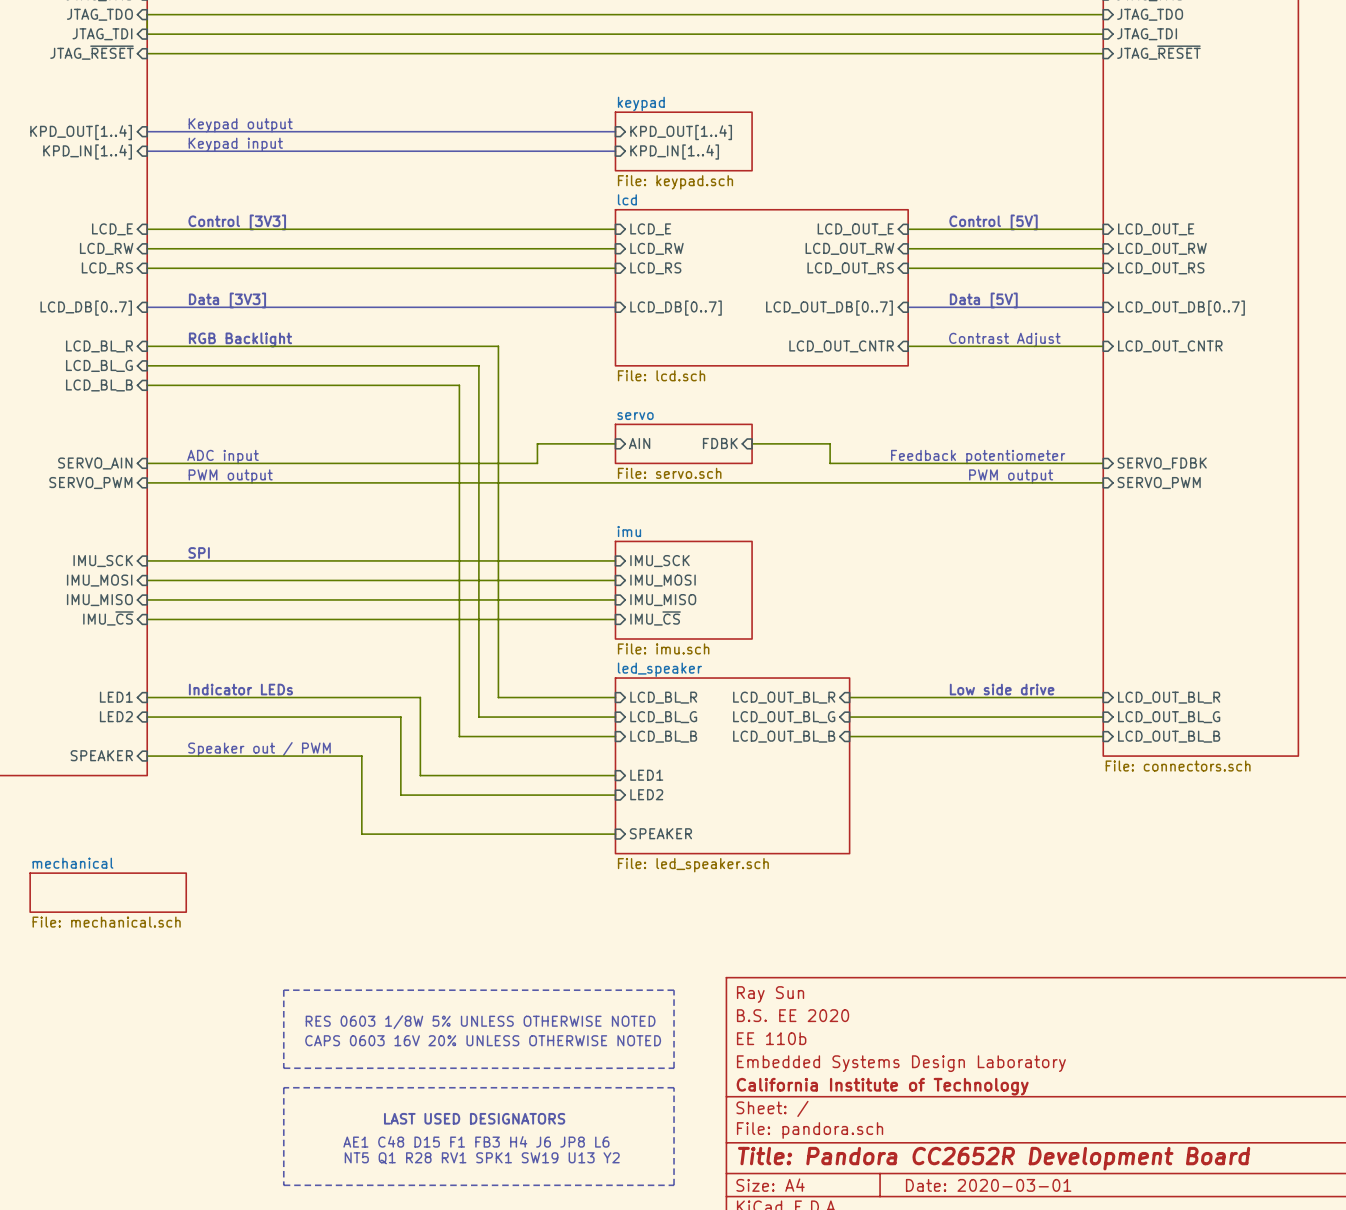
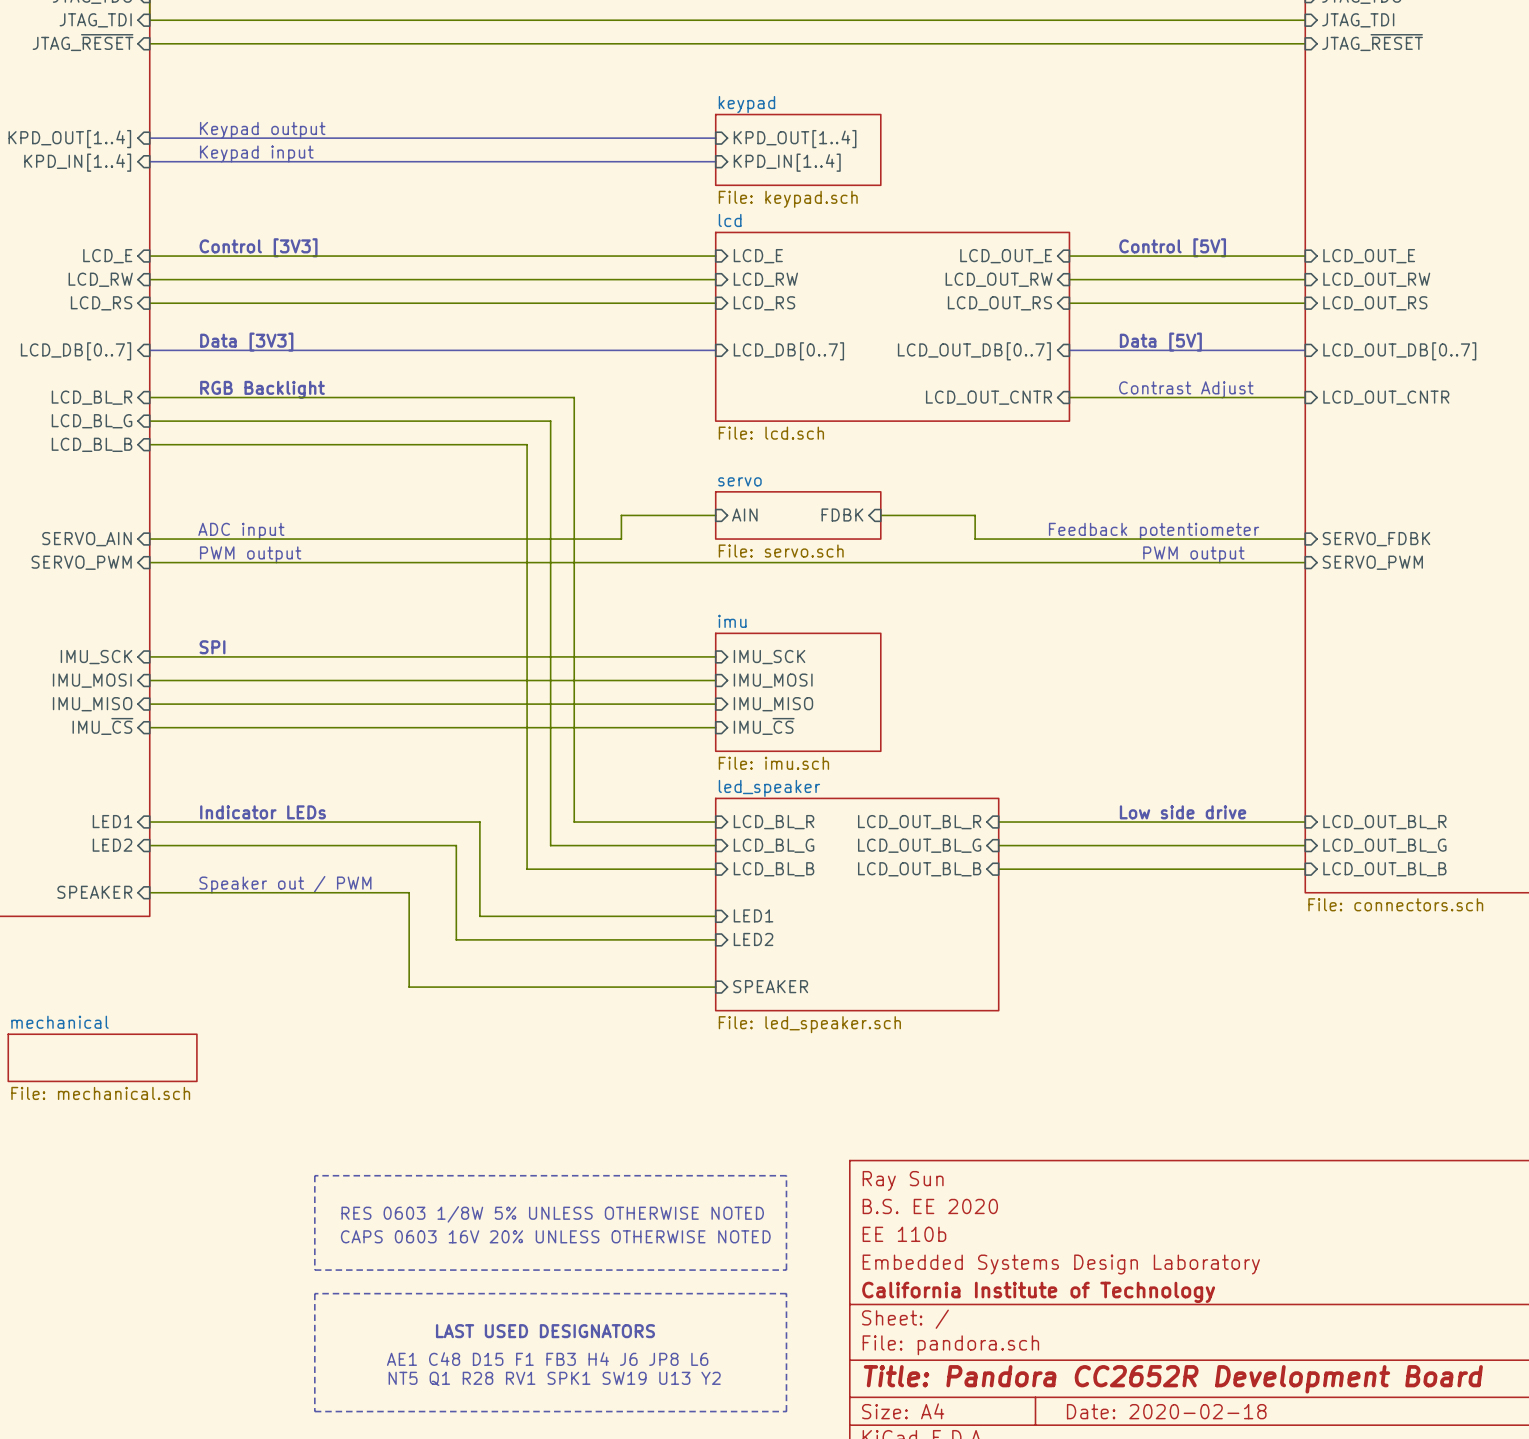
title block: Date: 2020-03-01 (988, 1185) -> Date: 2020-02-18 (1166, 1411)

